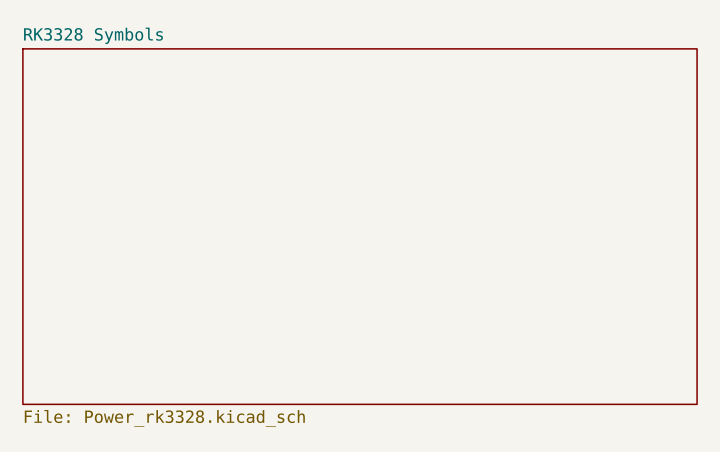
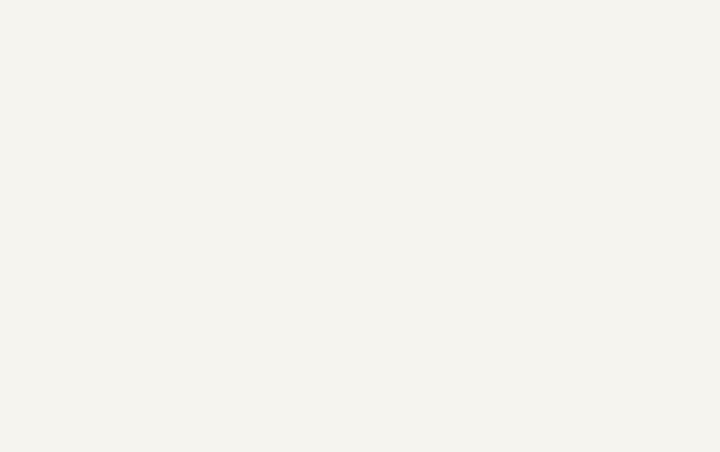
sheet RK3328 Symbols: File: Power_rk3328.kicad_sch (359, 226) -> none

